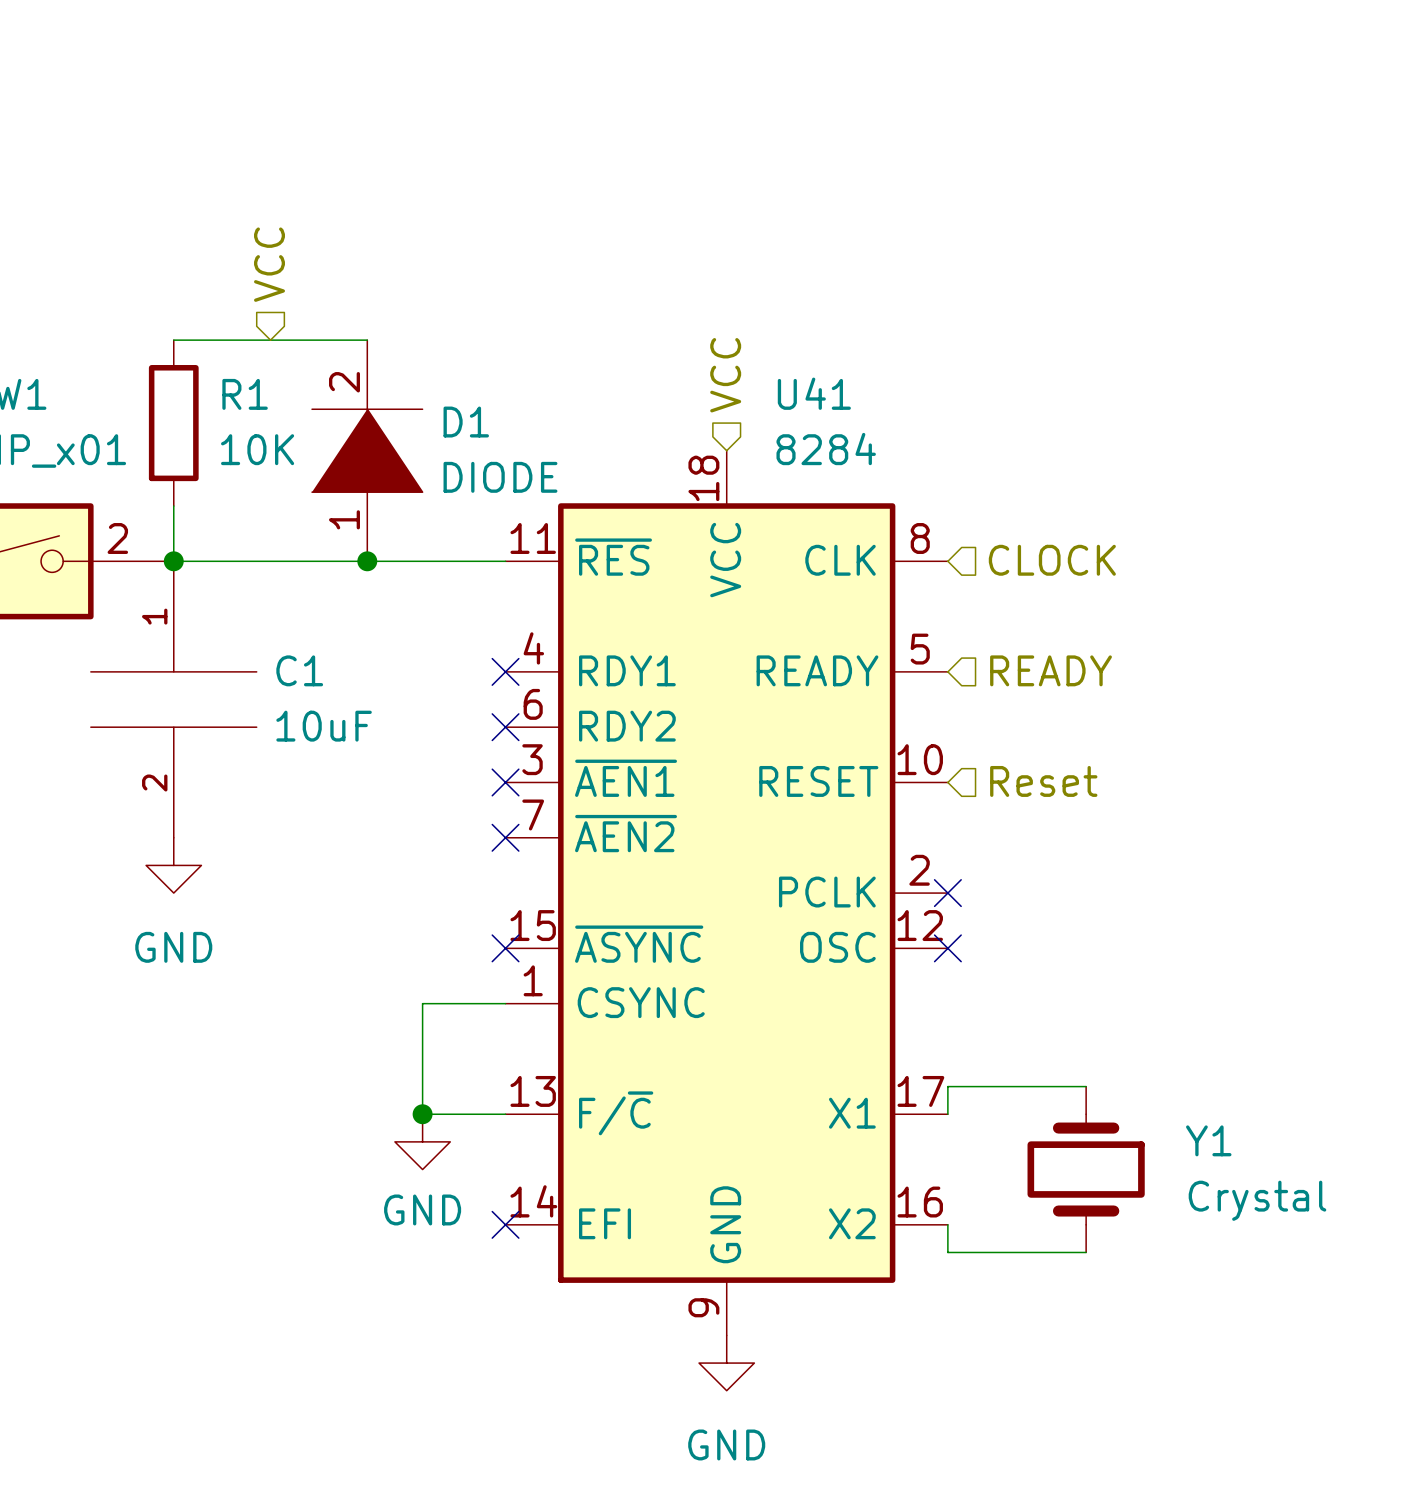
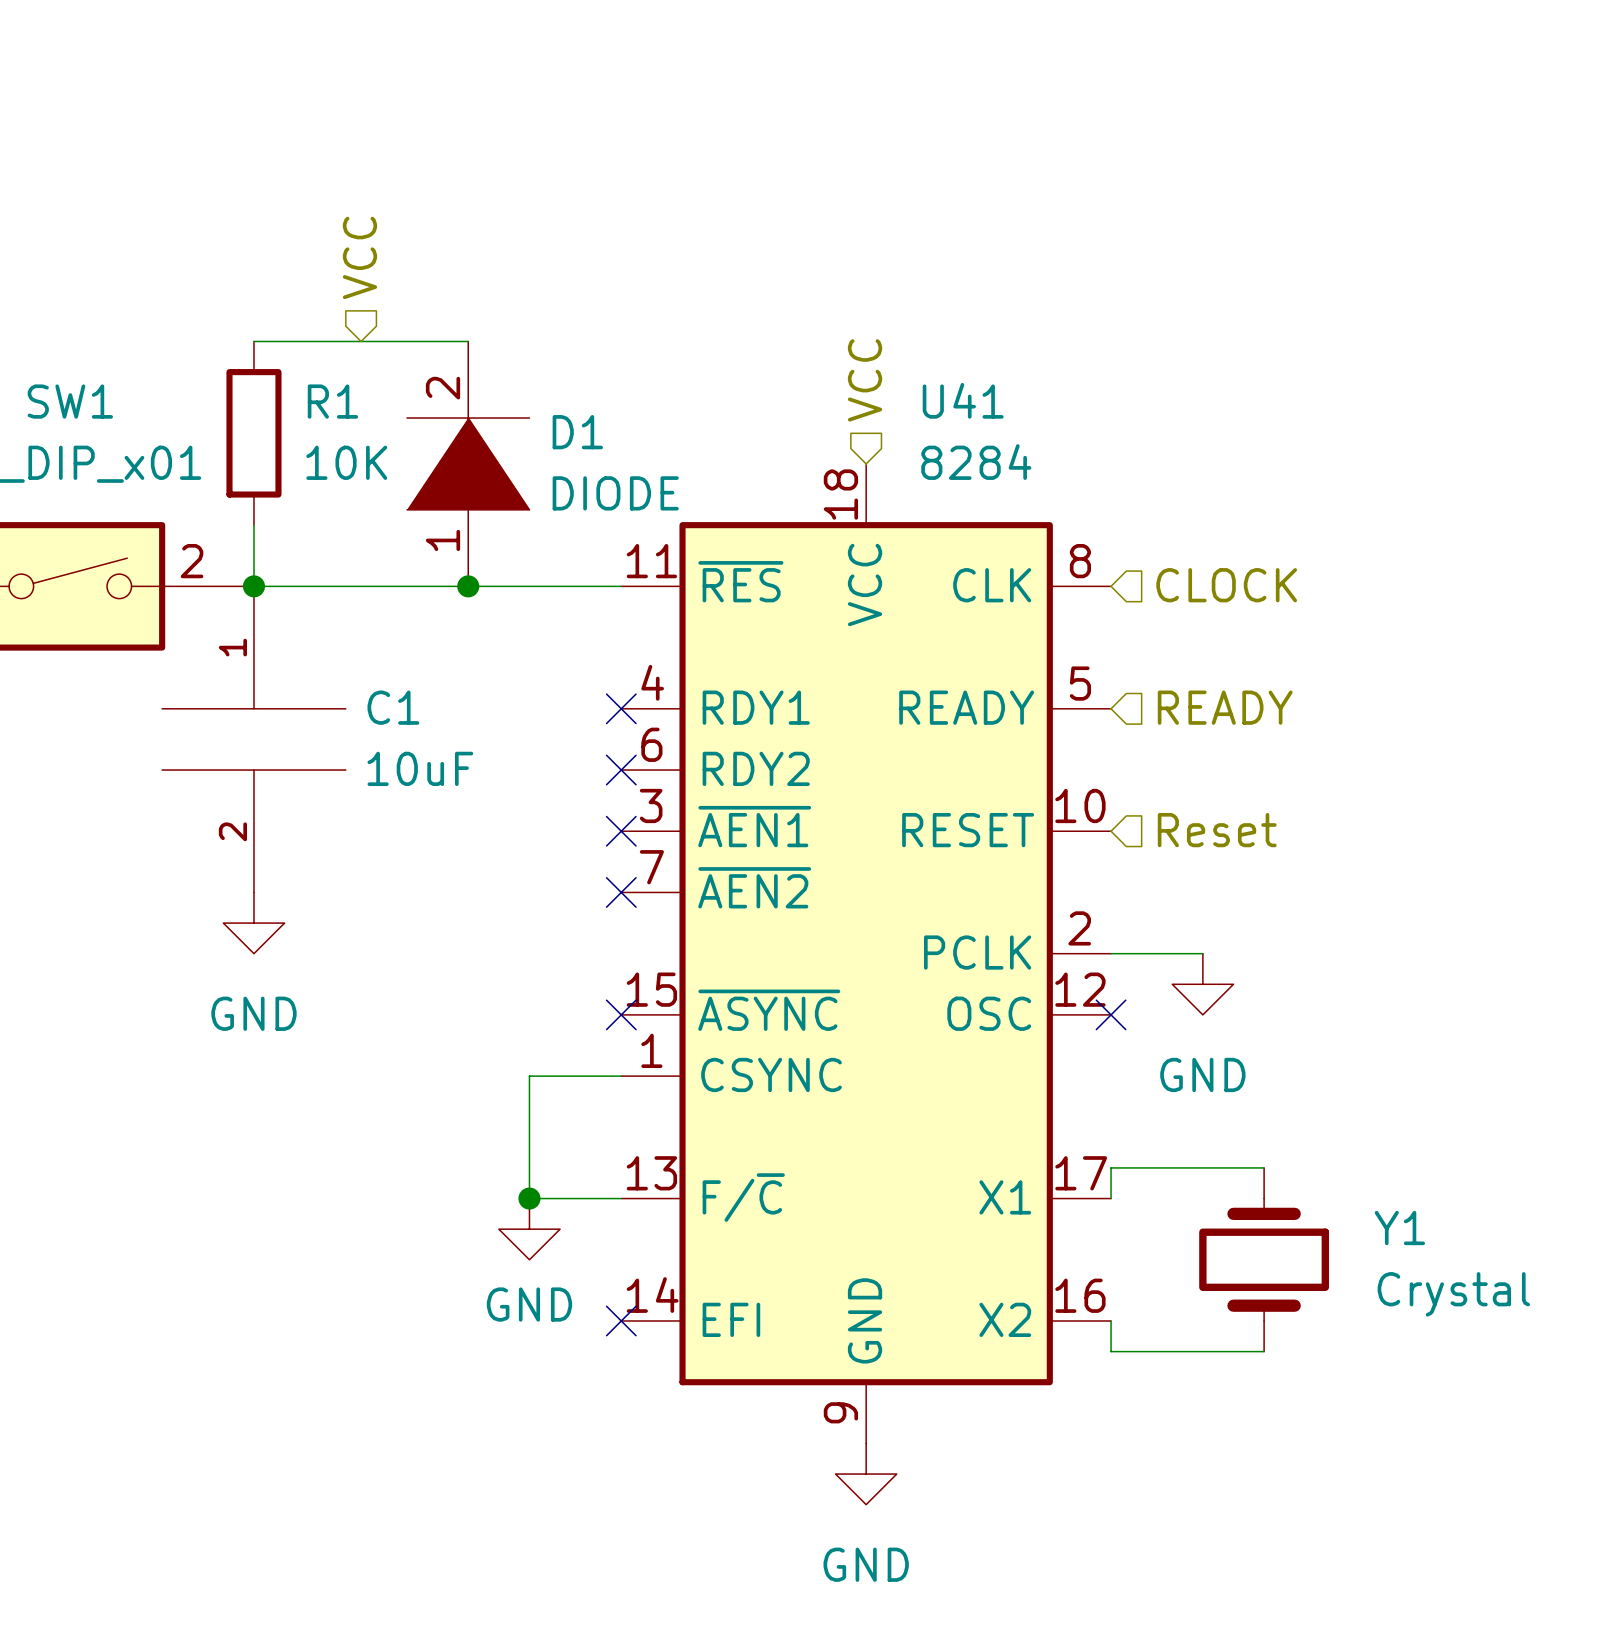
wire: none -> (1111, 953) (1202, 953)
no-connect mark: (947, 893) -> none
power symbol: none -> GND (1202, 984)

